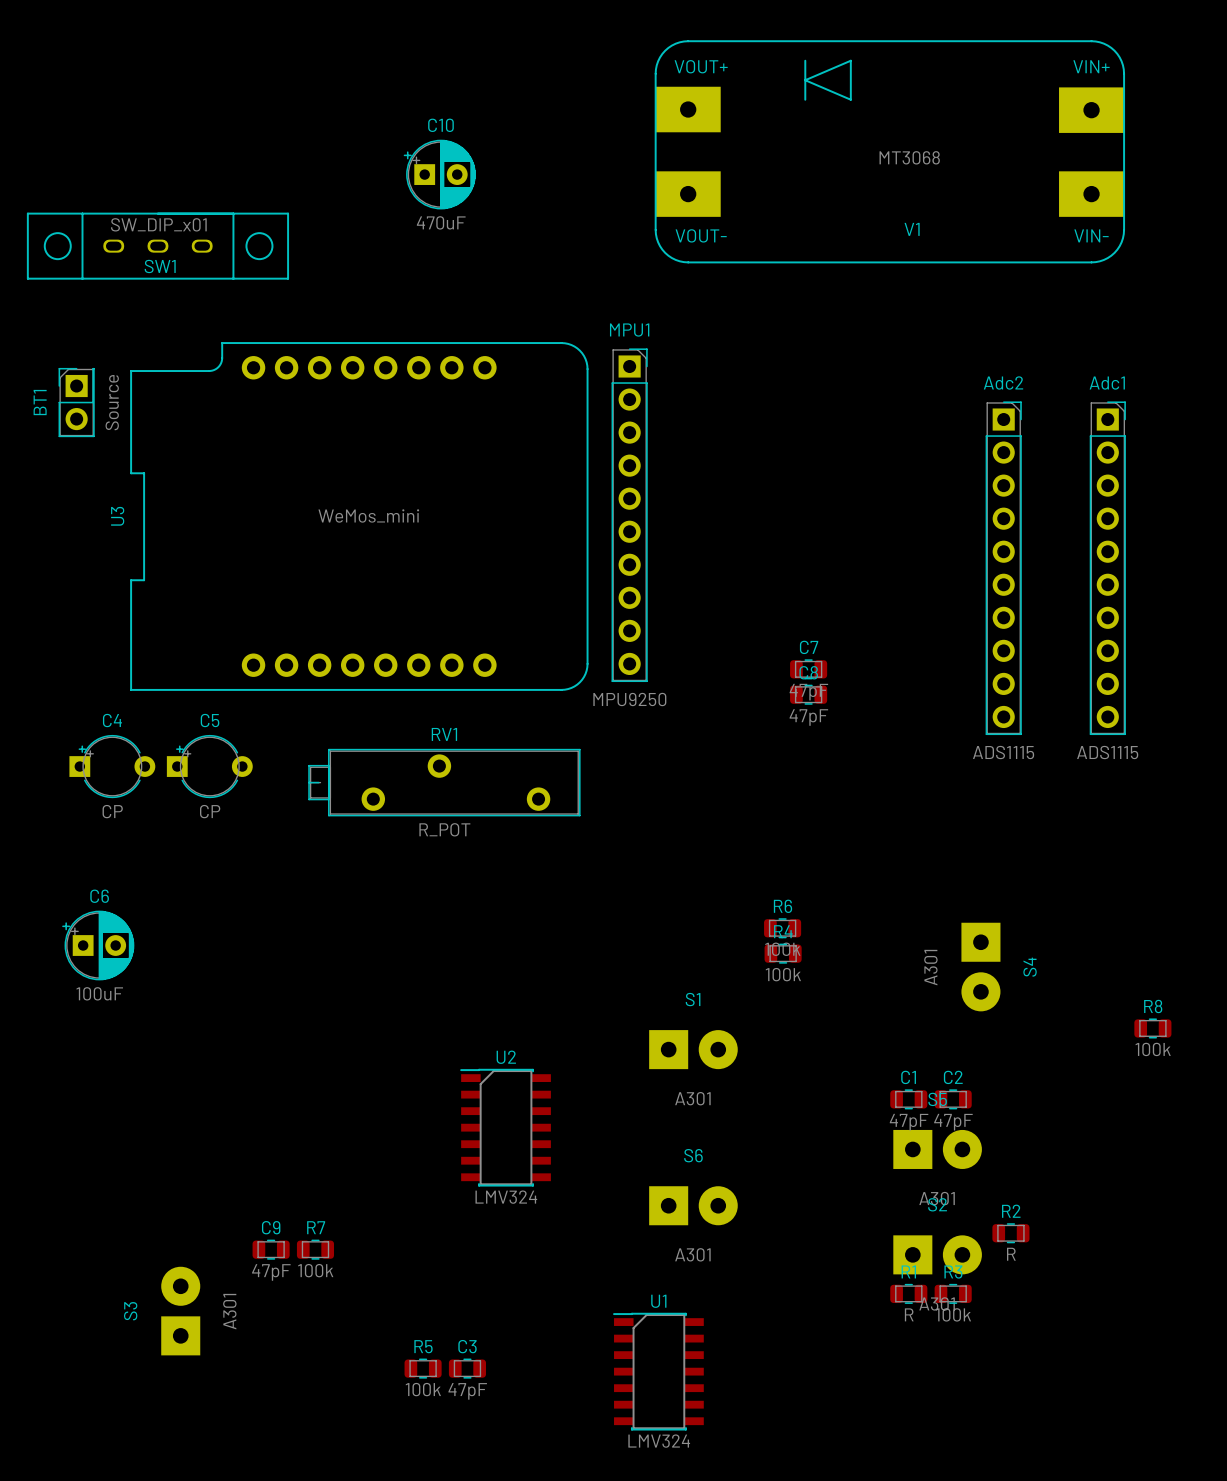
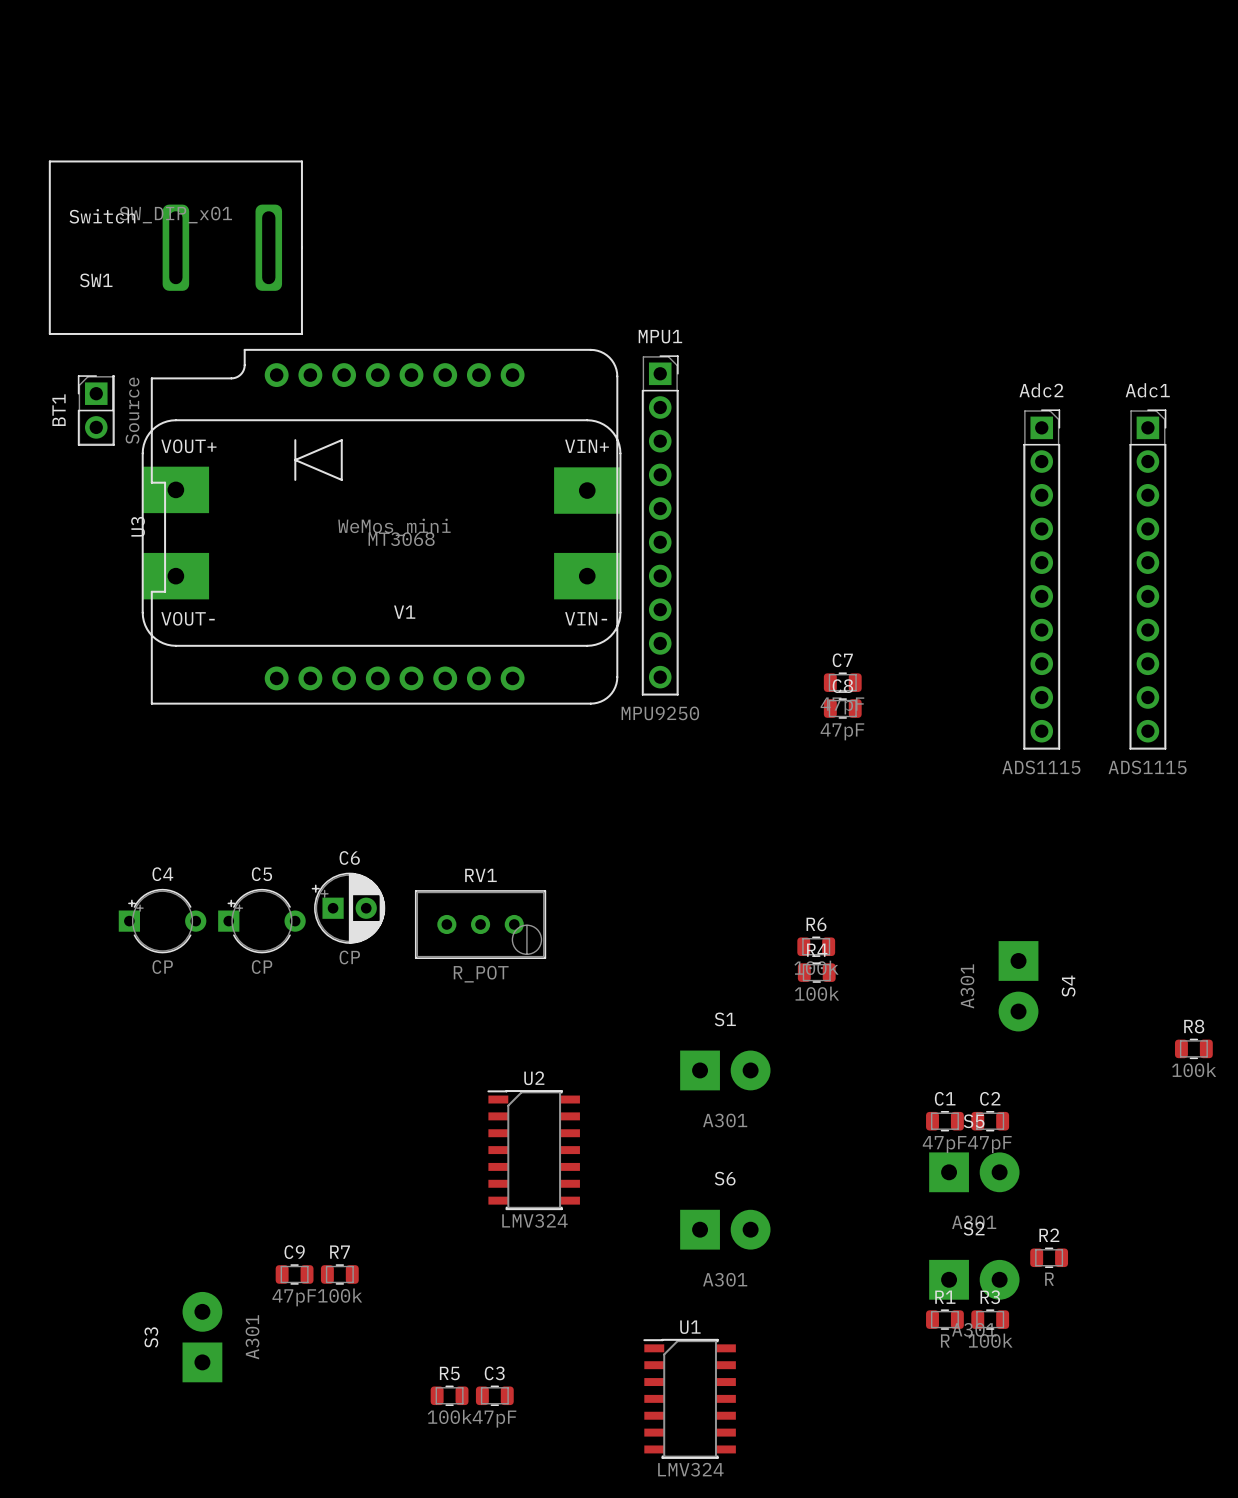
V1 position: (889, 151) -> (381, 533)
C10: 470uF (439, 174) -> none
SW1 footprint: [26, 212, 290, 280] -> [48, 160, 303, 335]
SW1 name position: SW1 (160, 266) -> SW1 (96, 280)
RV1 footprint: [308, 748, 581, 817] -> [414, 890, 547, 959]
C4 position: (112, 766) -> (162, 921)
C5 position: (209, 766) -> (261, 921)
C6 position: (98, 945) -> (348, 908)
C6 value: 100uF (99, 993) -> CP (349, 957)

